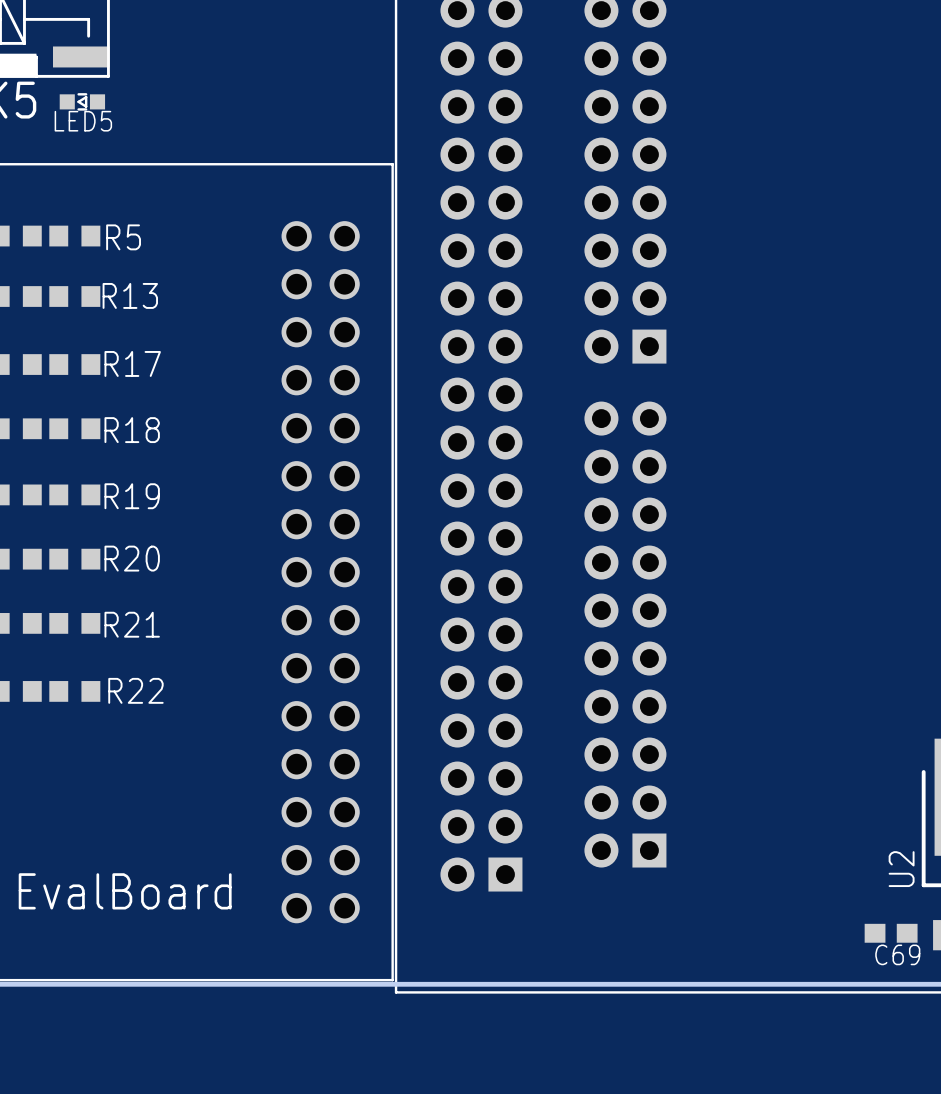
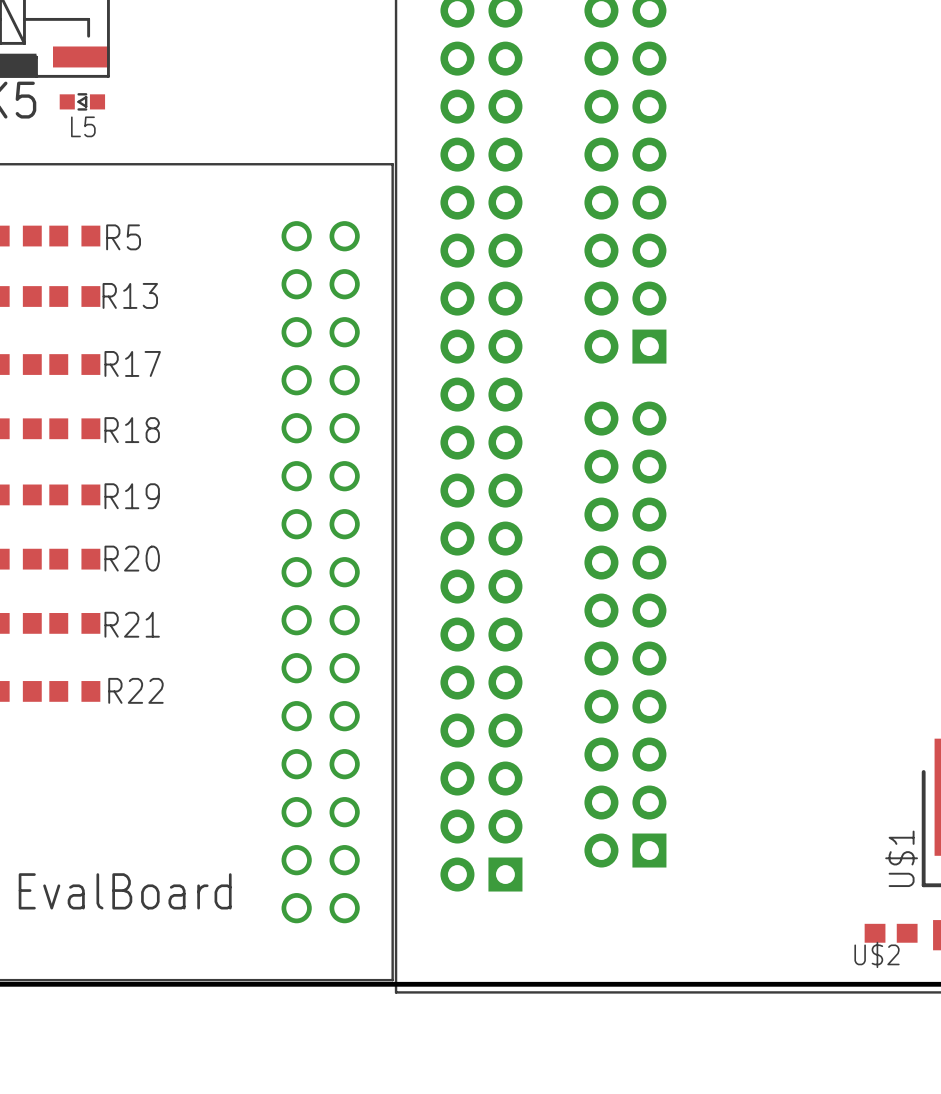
LED5 name: LED5 (83, 121) -> L5 (83, 126)
U2 name: U2 (901, 869) -> U$1 (901, 858)
C69 name: C69 (897, 954) -> U$2 (877, 954)

